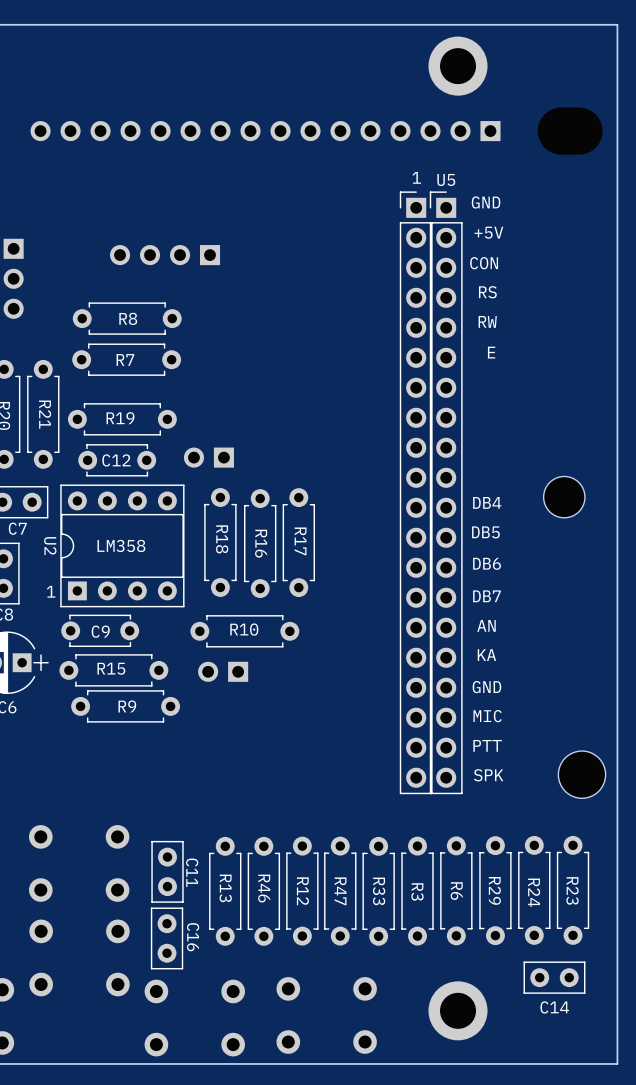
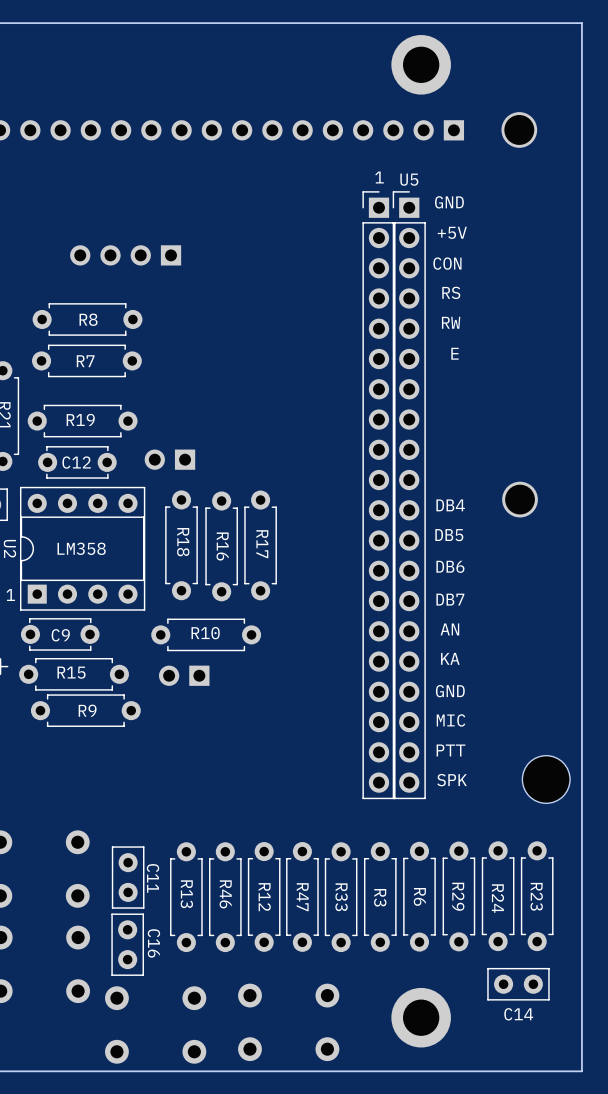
part: none -> (519, 129)
part: (570, 131) -> none
part footprint: [543, 476, 585, 518] -> [502, 481, 538, 518]

